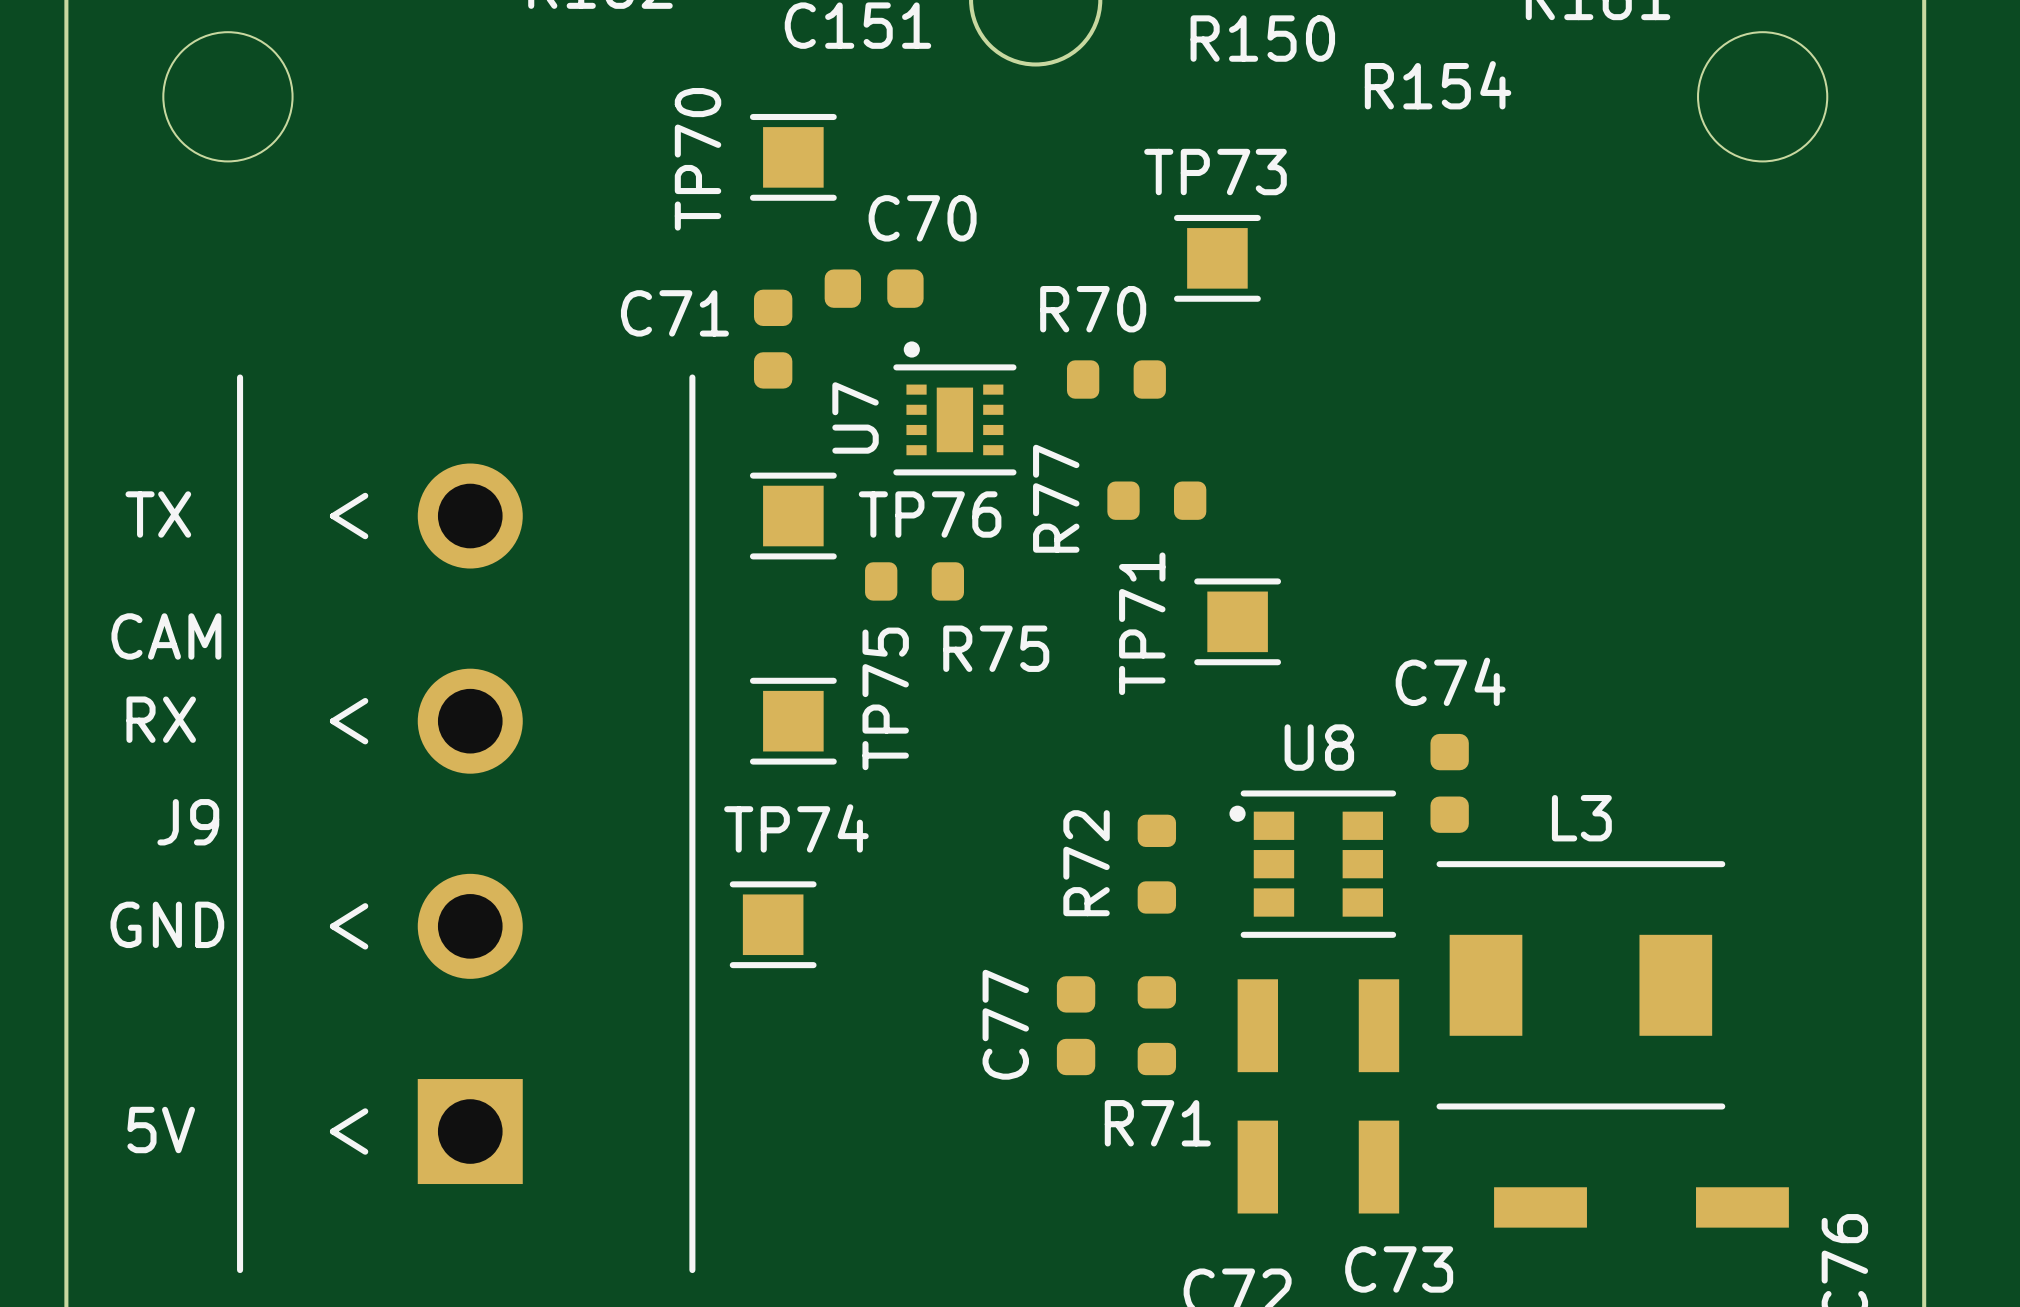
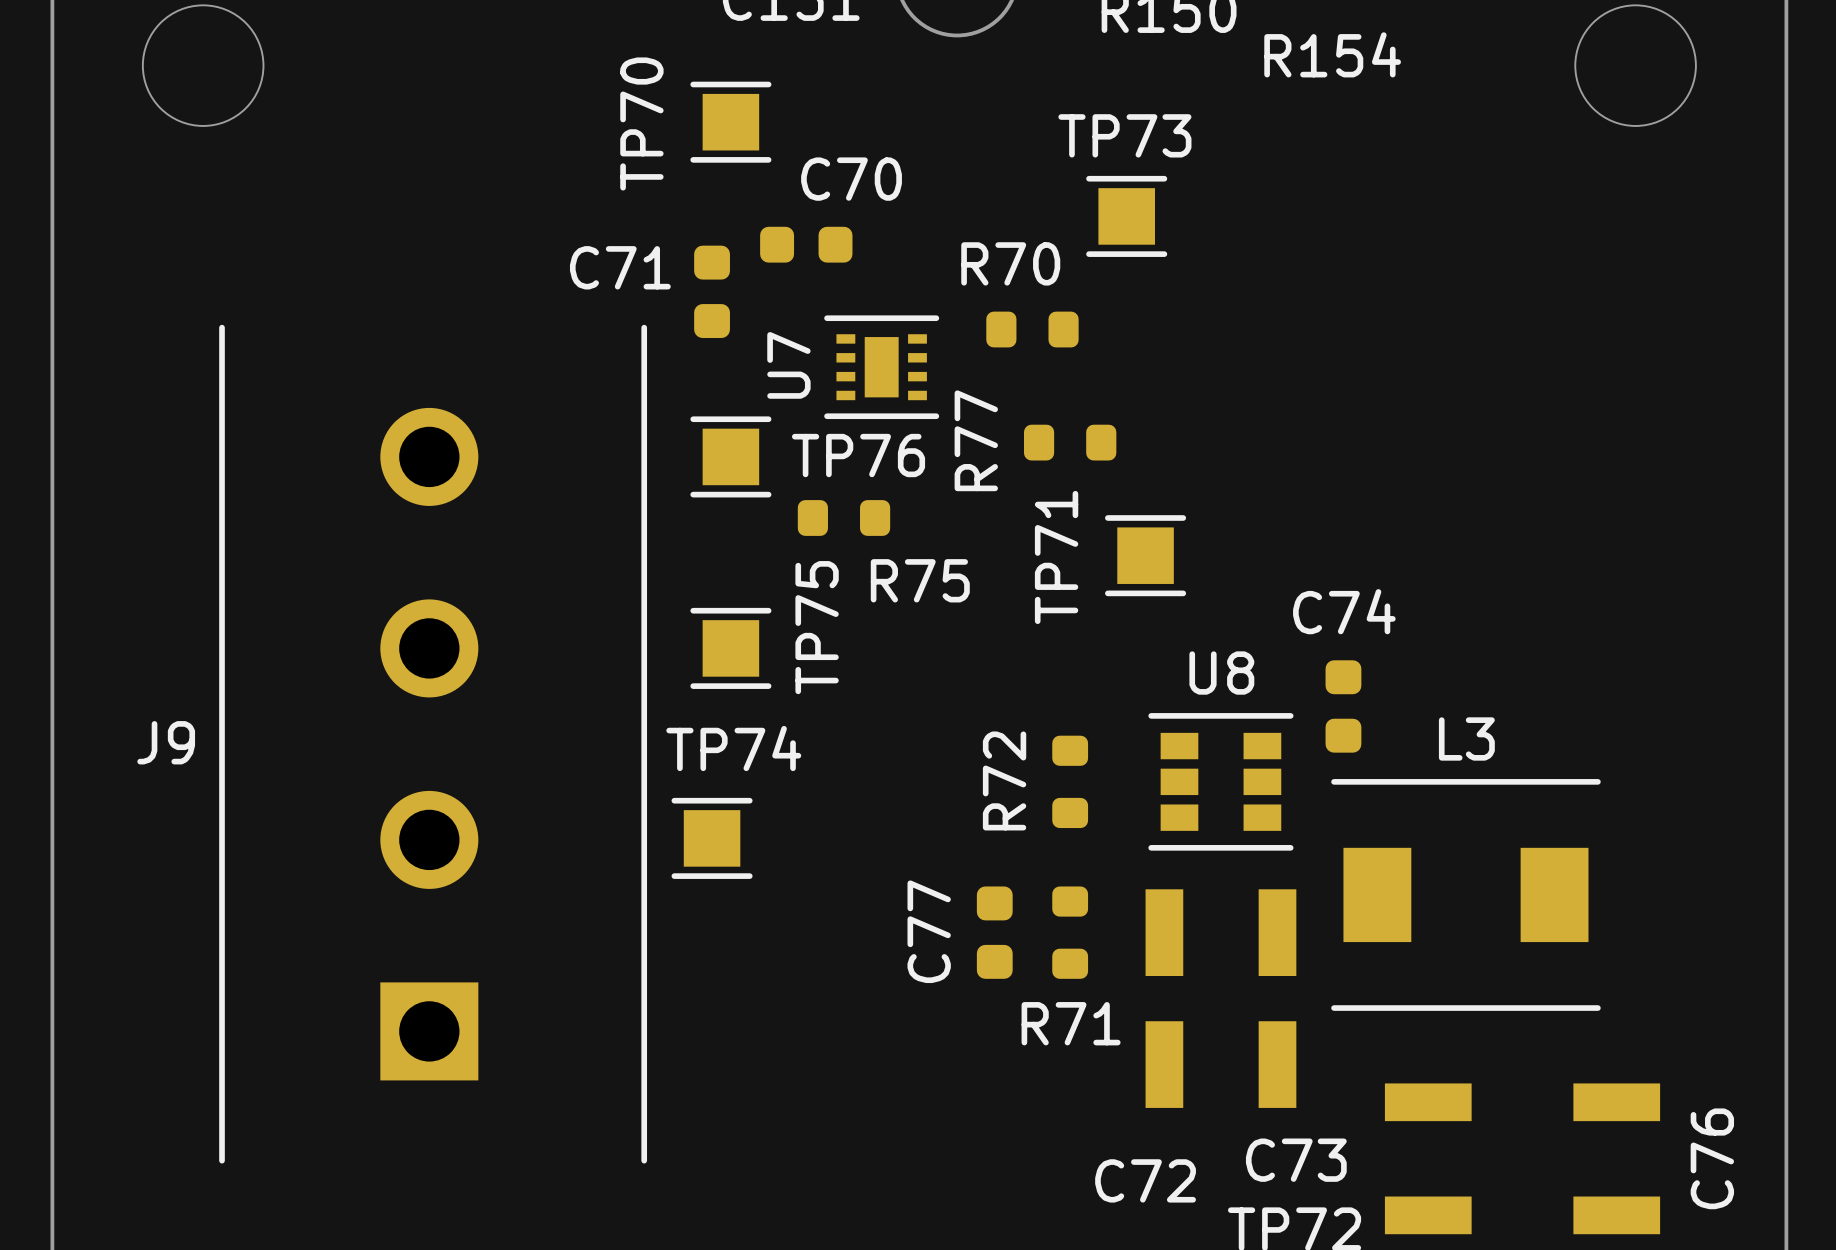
drawing: [903, 341, 920, 358] -> none
J9 footprint: [237, 374, 696, 1274] -> [219, 324, 648, 1164]
text: TX (158, 514) -> none
text: CAM (166, 636) -> none
text: RX (161, 719) -> none
drawing: [1229, 805, 1246, 822] -> none
text: GND (167, 924) -> none
text: 5V (161, 1130) -> none

